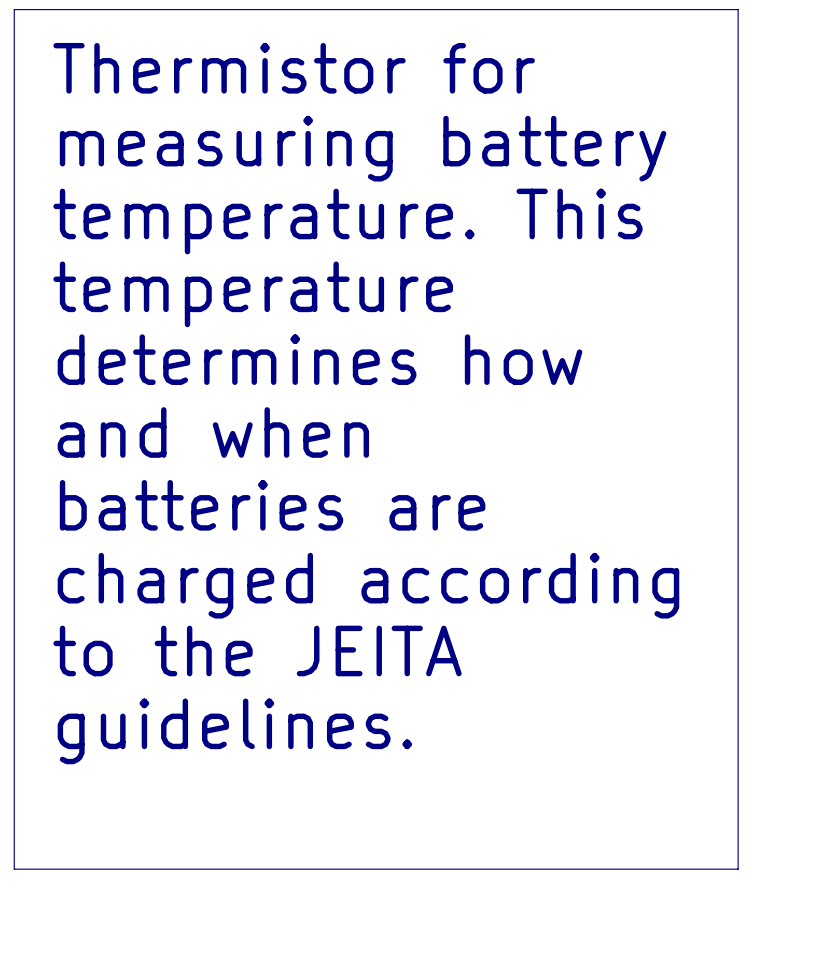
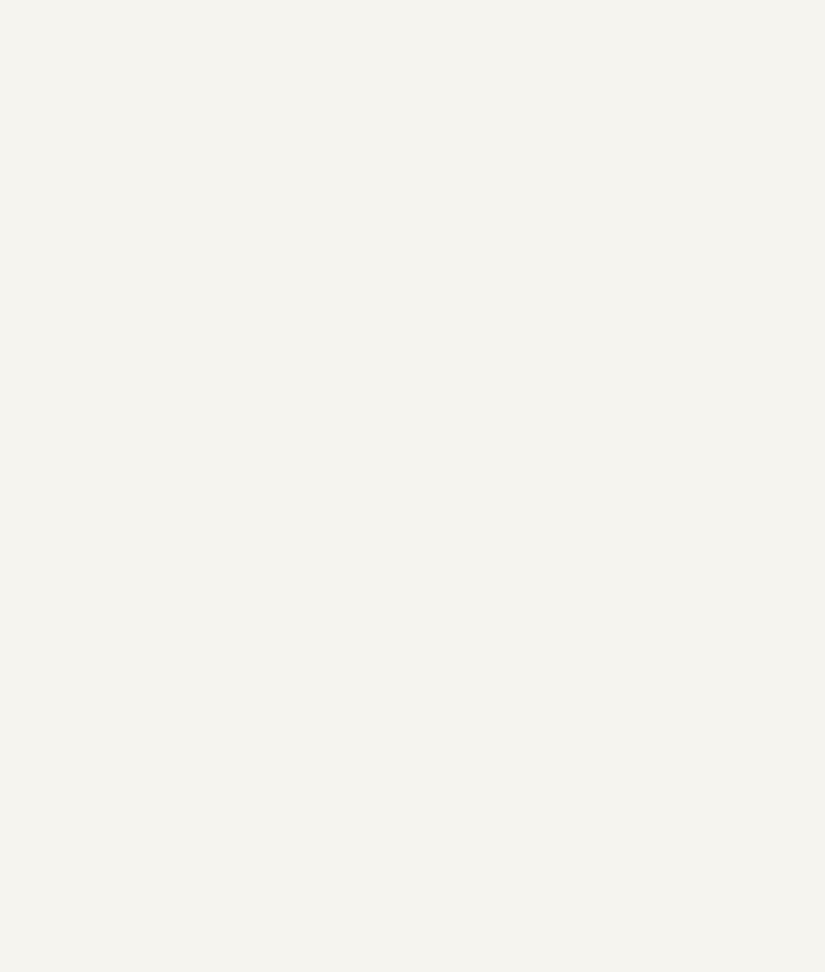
line: (14, 9) (738, 9) (738, 869) (14, 869) (14, 9) -> none
text: Thermistor for (294, 68) -> none
text: measuring battery (363, 148) -> none
text: temperature. This (347, 221) -> none
text: temperature (253, 294) -> none
text: determines how (319, 359) -> none
text: and when (213, 432) -> none
text: batteries are (272, 505) -> none
text: charged according (368, 585) -> none
text: to the JEITA (257, 651) -> none
text: guidelines. (234, 731) -> none

